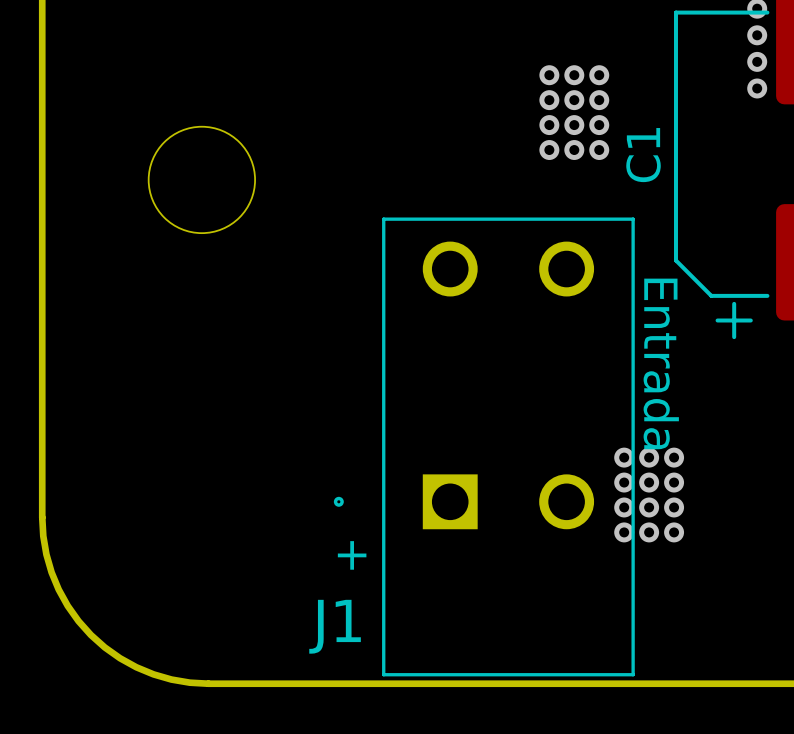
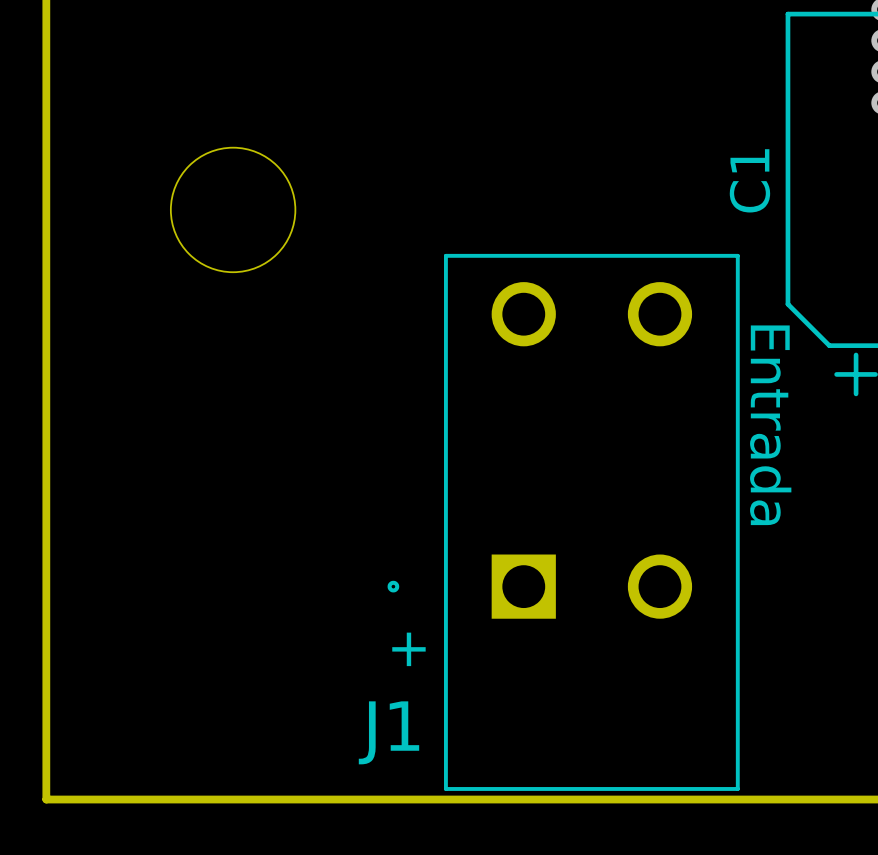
via: (549, 75) -> none
via: (574, 75) -> none
via: (599, 75) -> none
via: (549, 100) -> none
via: (574, 100) -> none
via: (599, 100) -> none
via: (549, 125) -> none
via: (574, 125) -> none
via: (599, 125) -> none
via: (549, 150) -> none
via: (574, 150) -> none
via: (599, 150) -> none
via: (624, 457) -> none
via: (649, 457) -> none
via: (674, 457) -> none
via: (624, 482) -> none
via: (649, 482) -> none
via: (674, 482) -> none
via: (624, 507) -> none
via: (649, 507) -> none
via: (674, 507) -> none
board edge: (42, 517) (43, 536) (51, 572) (67, 605) (90, 635) (120, 658) (153, 674) (171, 679) (208, 683) -> (46, 604) (46, 799) (240, 799)
via: (624, 532) -> none
via: (649, 532) -> none
via: (674, 532) -> none

